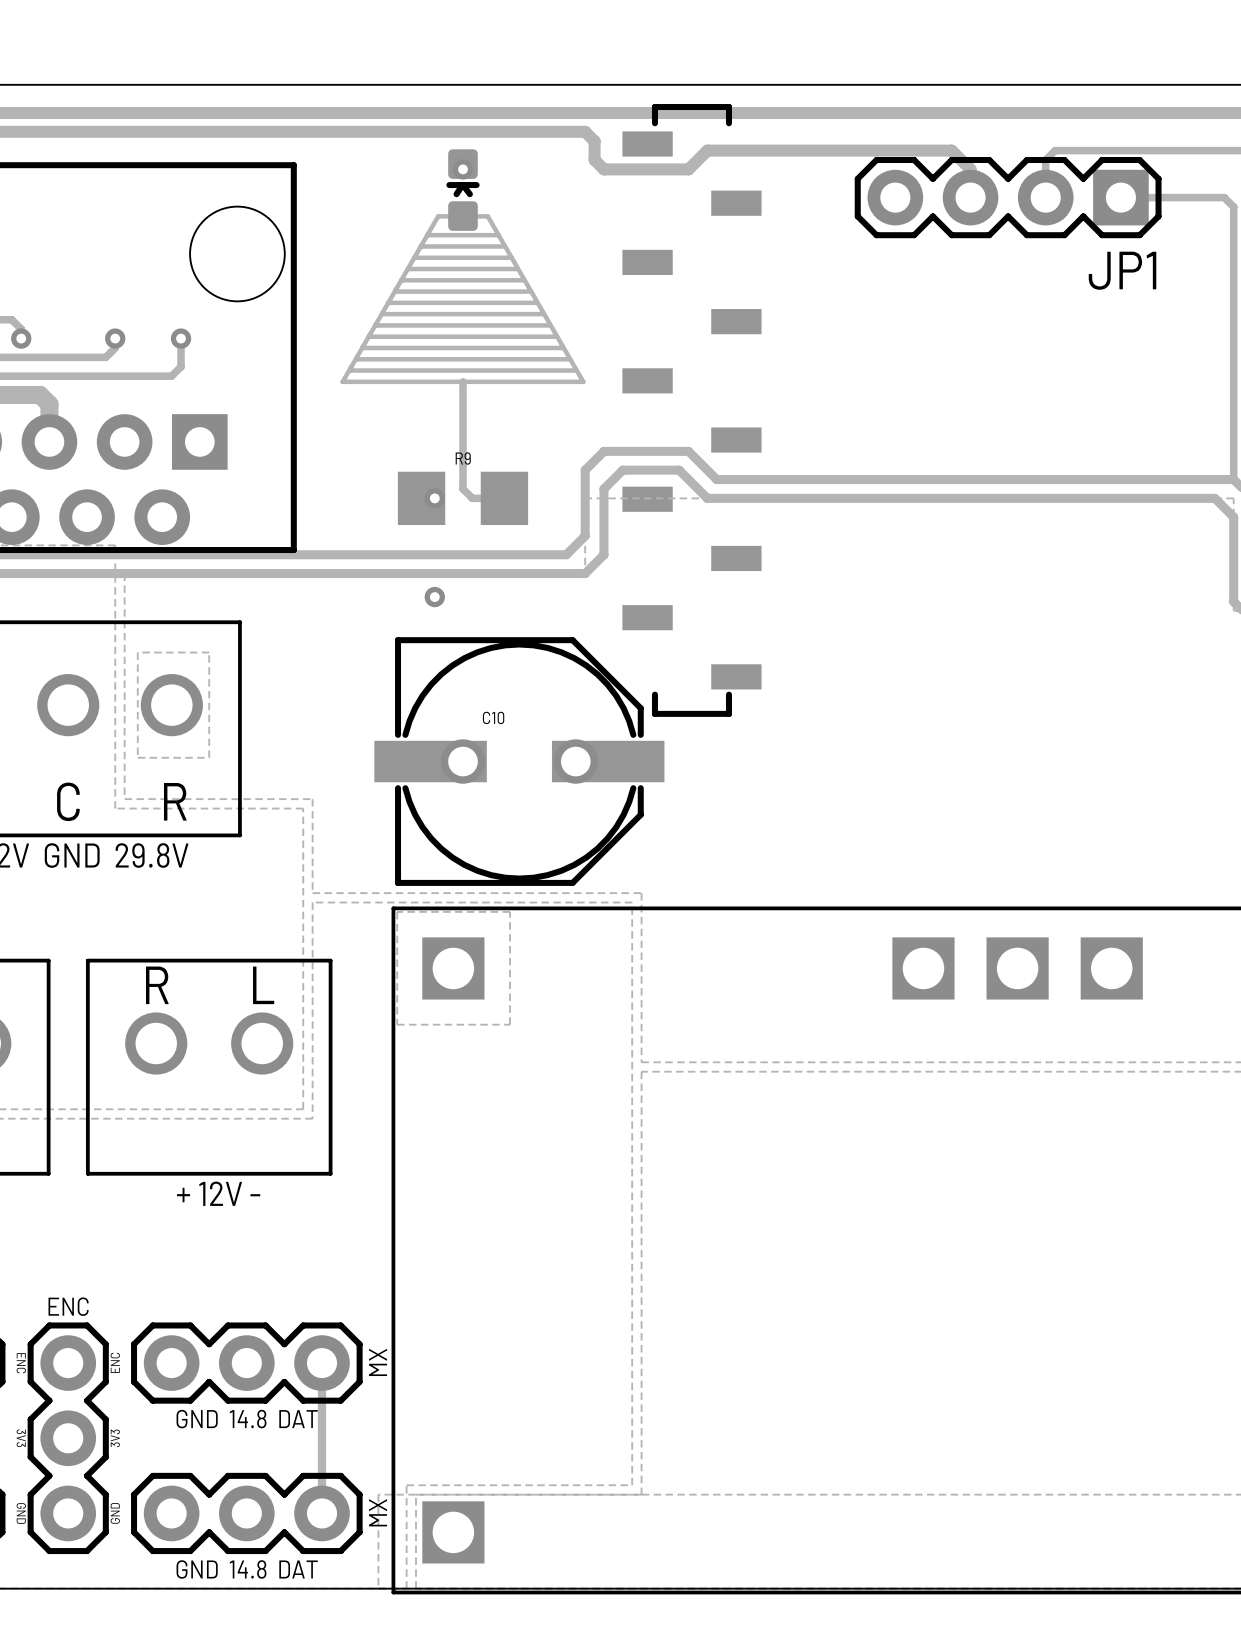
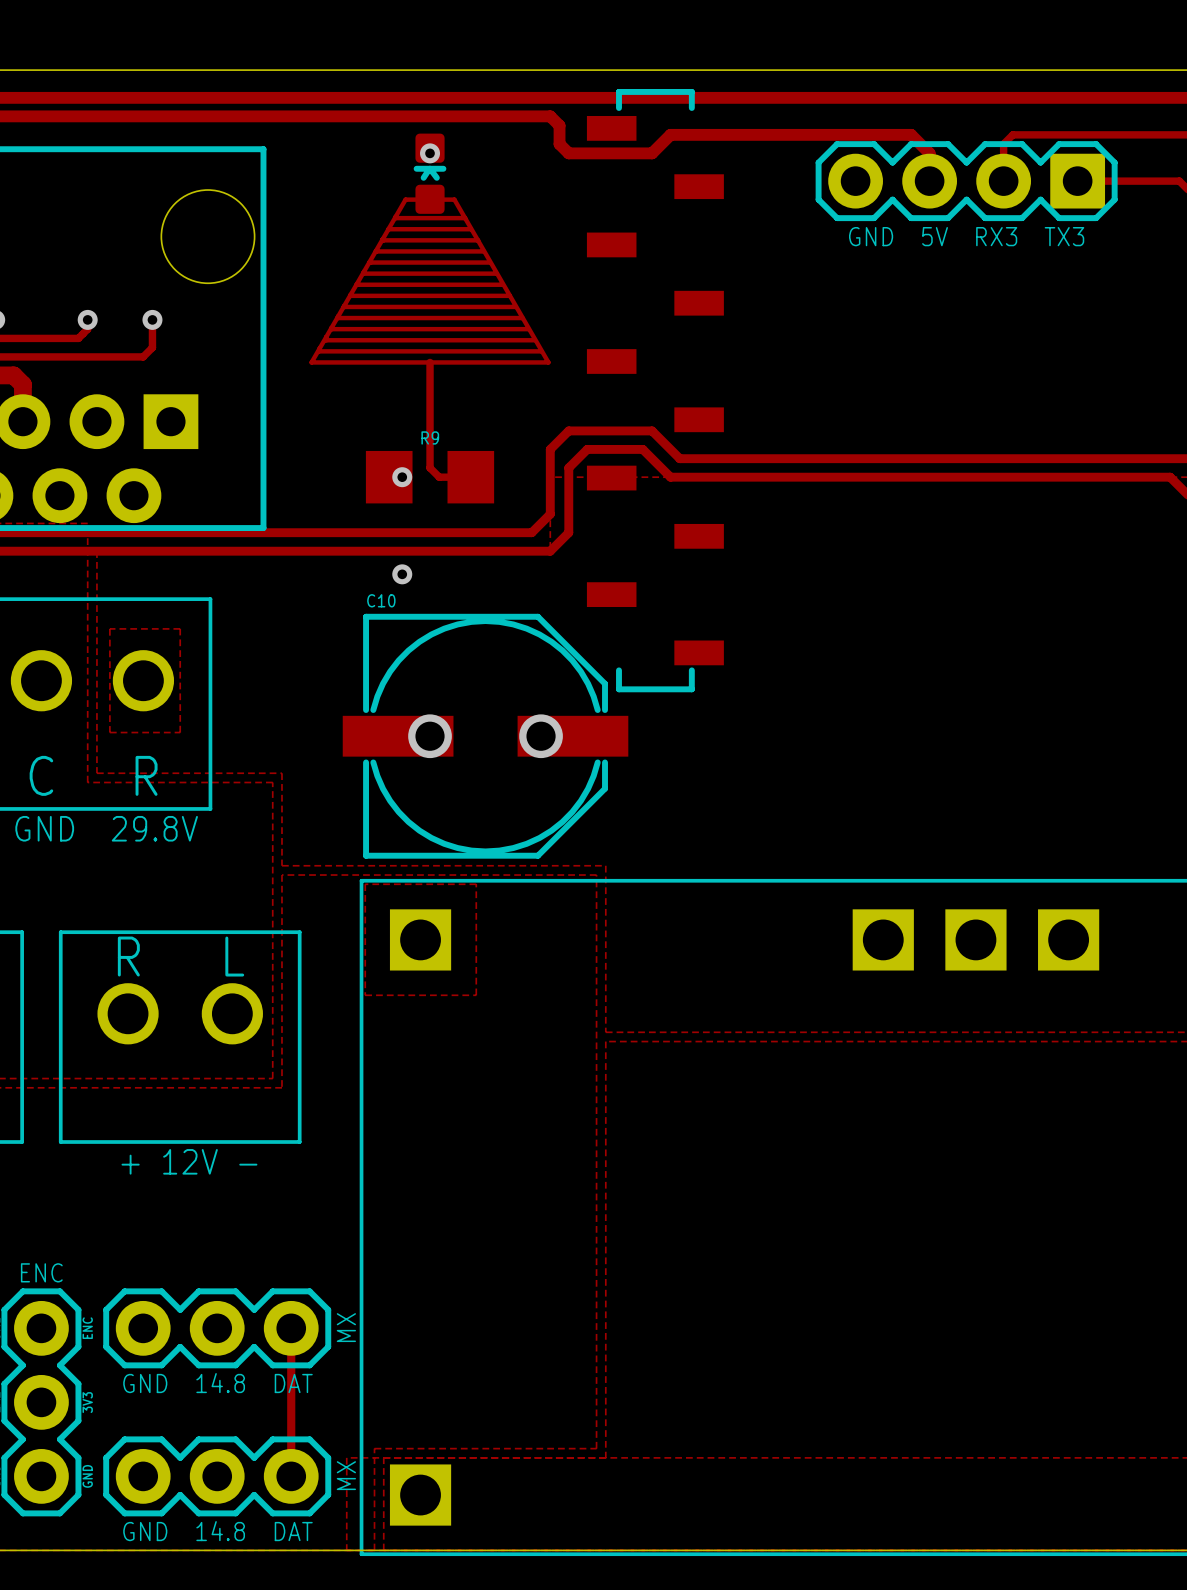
text: none -> GND 5V RX3 TX3 (966, 236)
JP1 name: JP1 (1122, 270) -> none
C10 name position: C10 (493, 717) -> C10 (381, 600)

